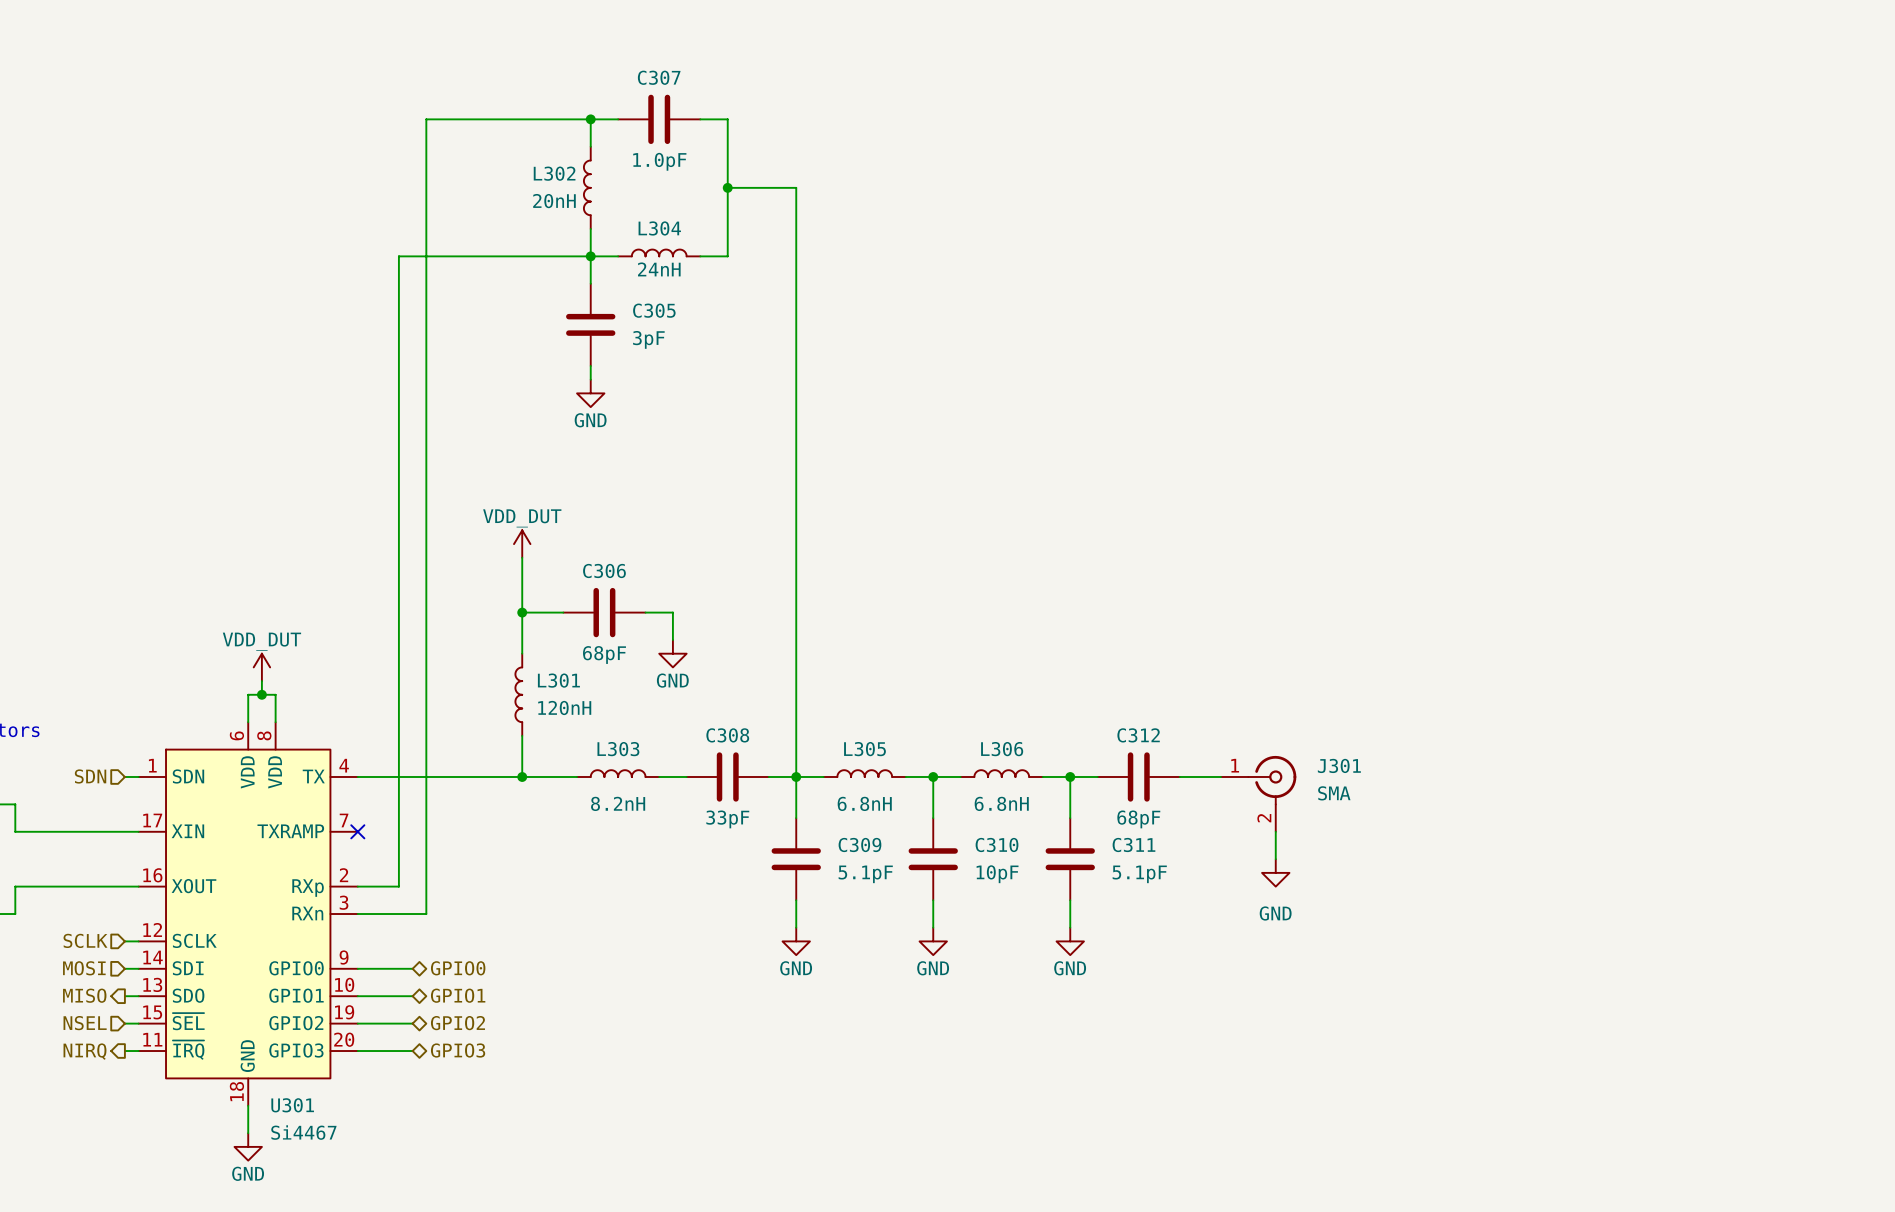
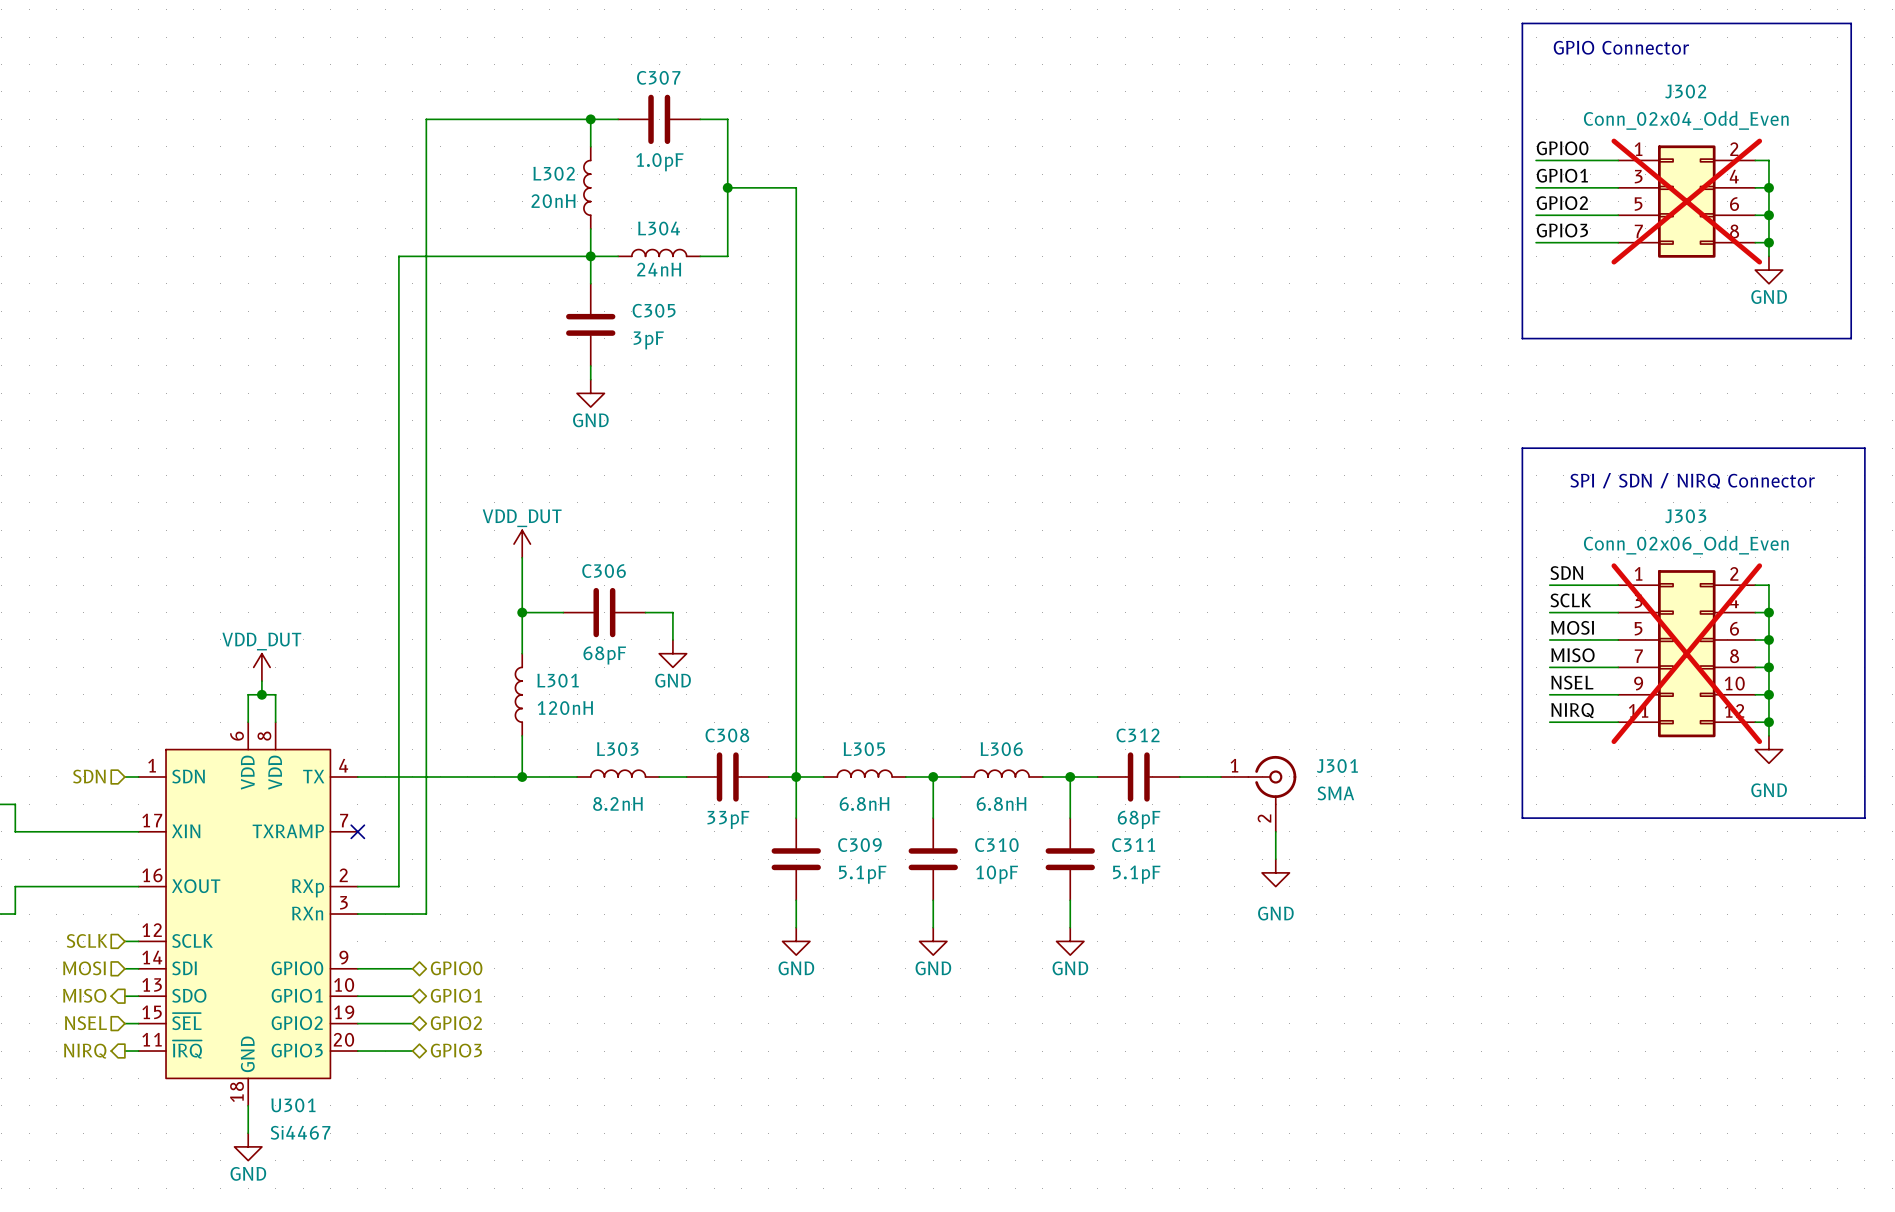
line: none -> (1522, 23) (1522, 338) (1851, 338) (1851, 23) (1522, 23)
text: none -> GPIO Connector (1621, 47)
label: none -> GPIO0 (1562, 148)
wire: none -> (1536, 160) (1618, 160)
wire: none -> (1755, 160) (1768, 160) (1768, 256)
label: none -> GPIO1 (1562, 175)
wire: none -> (1536, 187) (1618, 187)
wire: none -> (1755, 187) (1768, 187)
junction: none -> (1768, 187)
J302: none -> Conn_02x04_Odd_Even (1686, 201)
label: none -> GPIO2 (1562, 203)
wire: none -> (1536, 215) (1618, 215)
wire: none -> (1755, 215) (1768, 215)
junction: none -> (1768, 215)
label: none -> GPIO3 (1562, 230)
wire: none -> (1536, 242) (1618, 242)
wire: none -> (1755, 242) (1768, 242)
junction: none -> (1768, 242)
power symbol: none -> GND (1768, 270)
line: none -> (1522, 448) (1864, 448) (1864, 818) (1522, 818) (1522, 448)
text: none -> SPI / SDN / NIRQ Connector (1692, 480)
label: none -> SDN (1566, 573)
wire: none -> (1549, 585) (1618, 585)
wire: none -> (1755, 585) (1768, 585) (1768, 735)
label: none -> SCLK (1570, 600)
wire: none -> (1549, 612) (1618, 612)
wire: none -> (1755, 612) (1768, 612)
junction: none -> (1768, 612)
label: none -> MOSI (1572, 627)
wire: none -> (1549, 639) (1618, 639)
wire: none -> (1755, 639) (1768, 639)
junction: none -> (1768, 639)
J303: none -> Conn_02x06_Odd_Even (1686, 653)
label: none -> MISO (1572, 655)
wire: none -> (1549, 667) (1618, 667)
wire: none -> (1755, 667) (1768, 667)
junction: none -> (1768, 667)
label: none -> NSEL (1572, 682)
wire: none -> (1549, 694) (1618, 694)
wire: none -> (1755, 694) (1768, 694)
junction: none -> (1768, 694)
label: none -> NIRQ (1572, 710)
wire: none -> (1549, 722) (1618, 722)
wire: none -> (1755, 722) (1768, 722)
junction: none -> (1768, 722)
power symbol: none -> GND (1768, 749)

